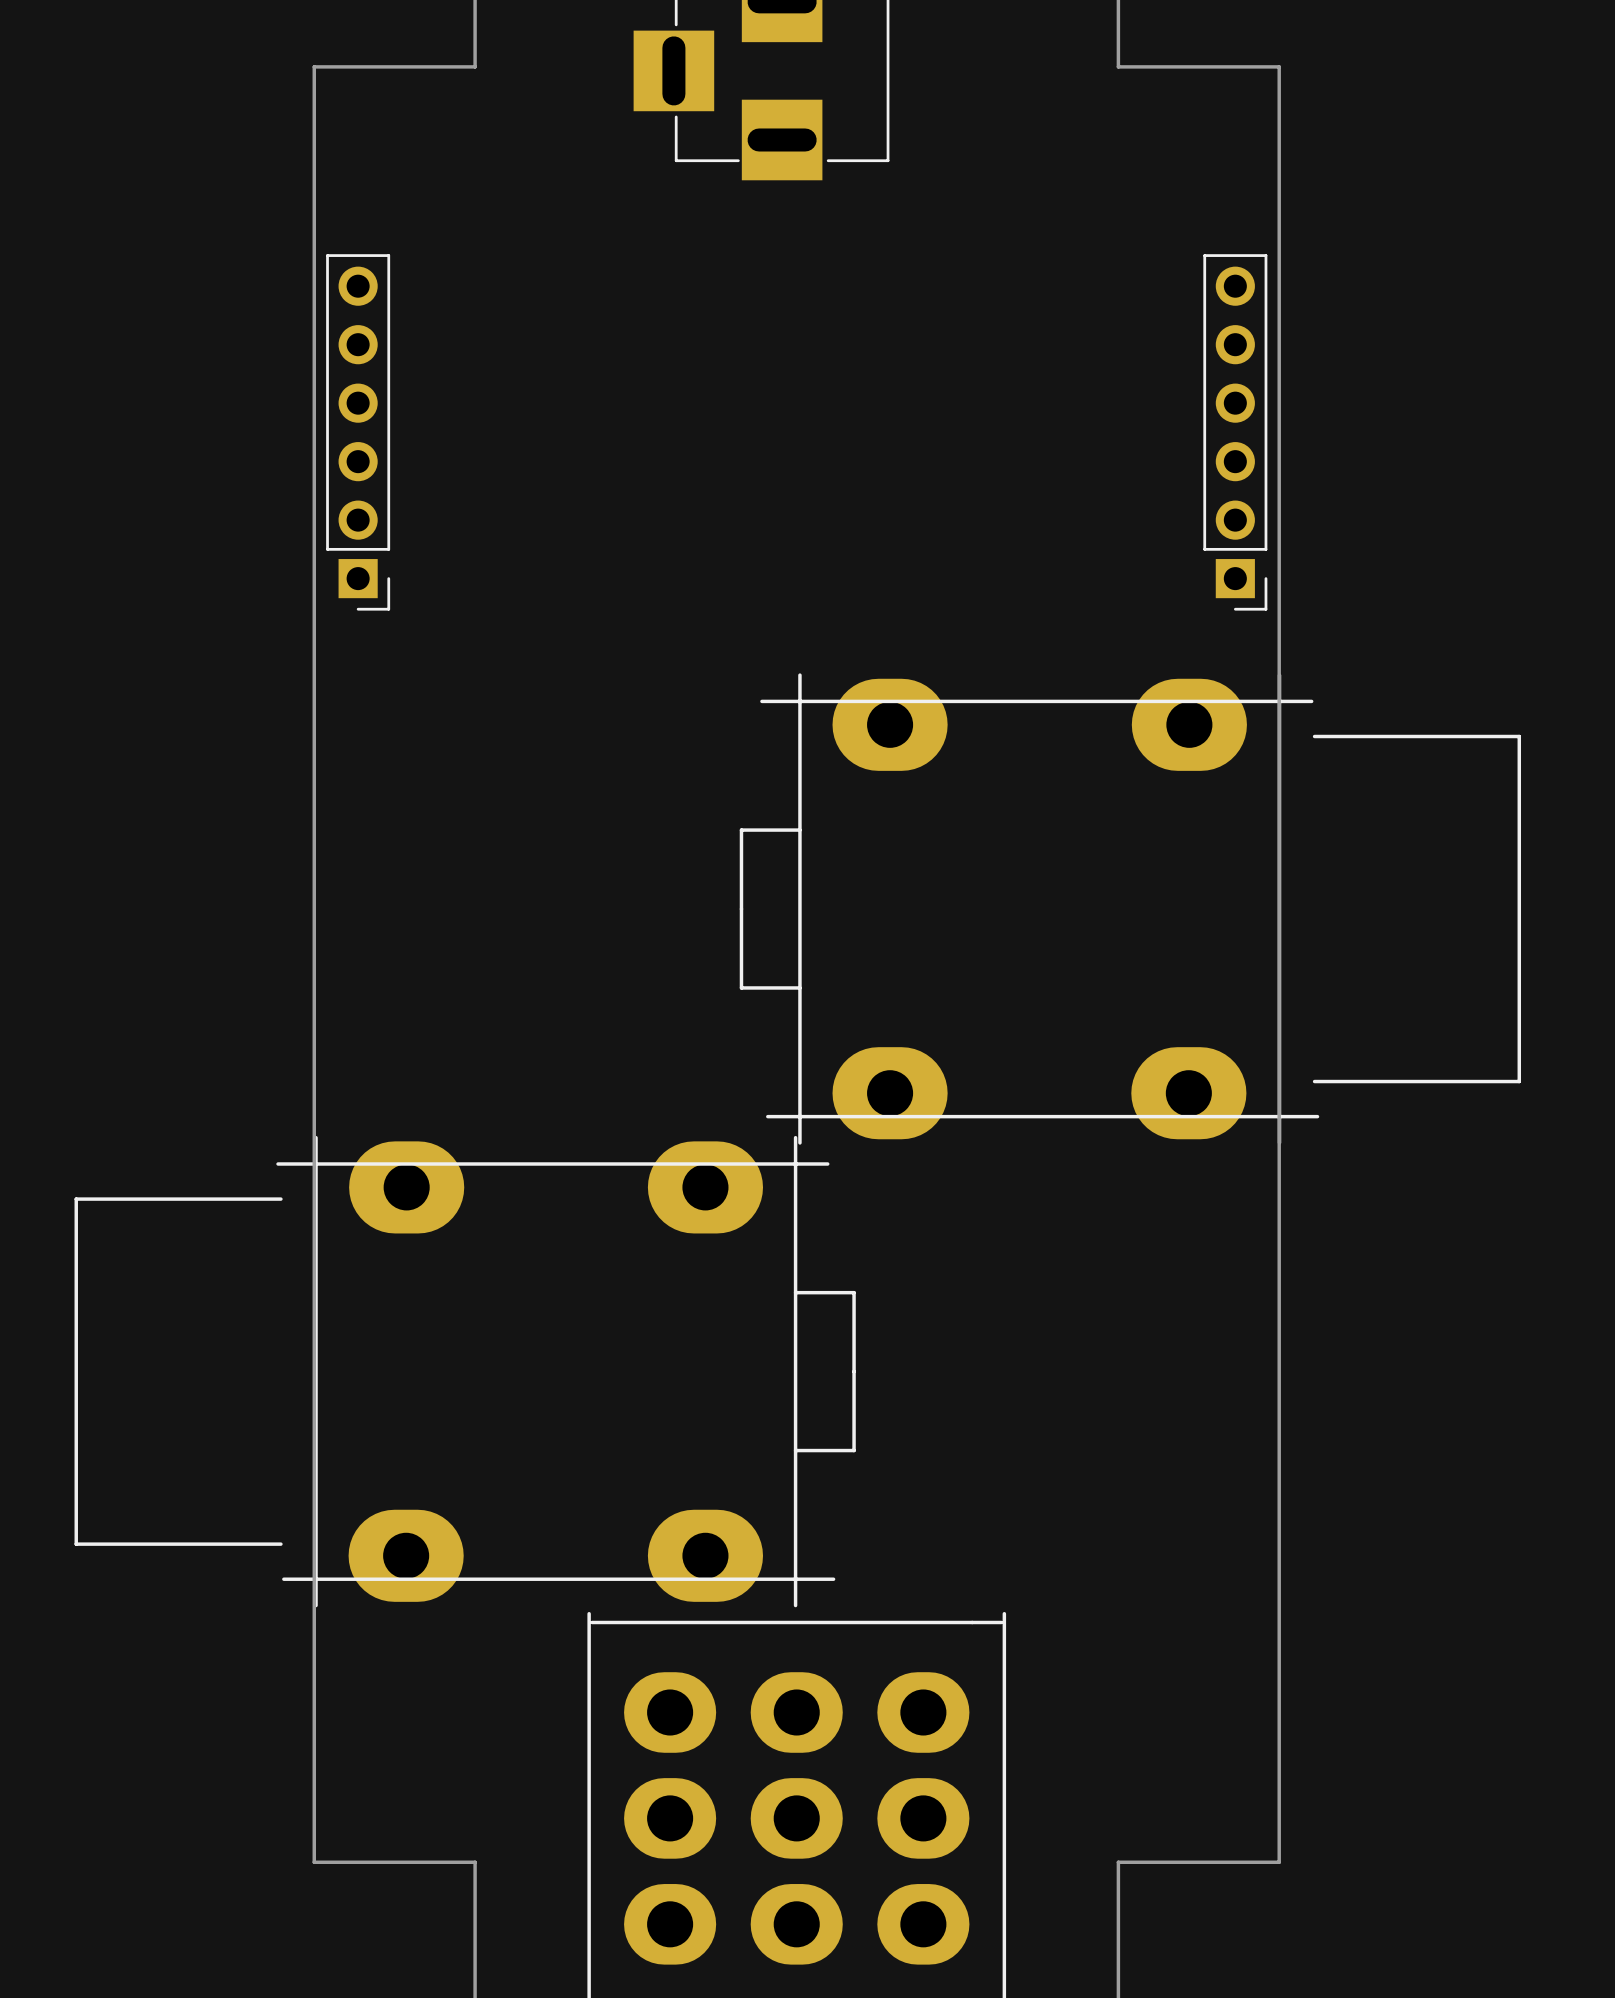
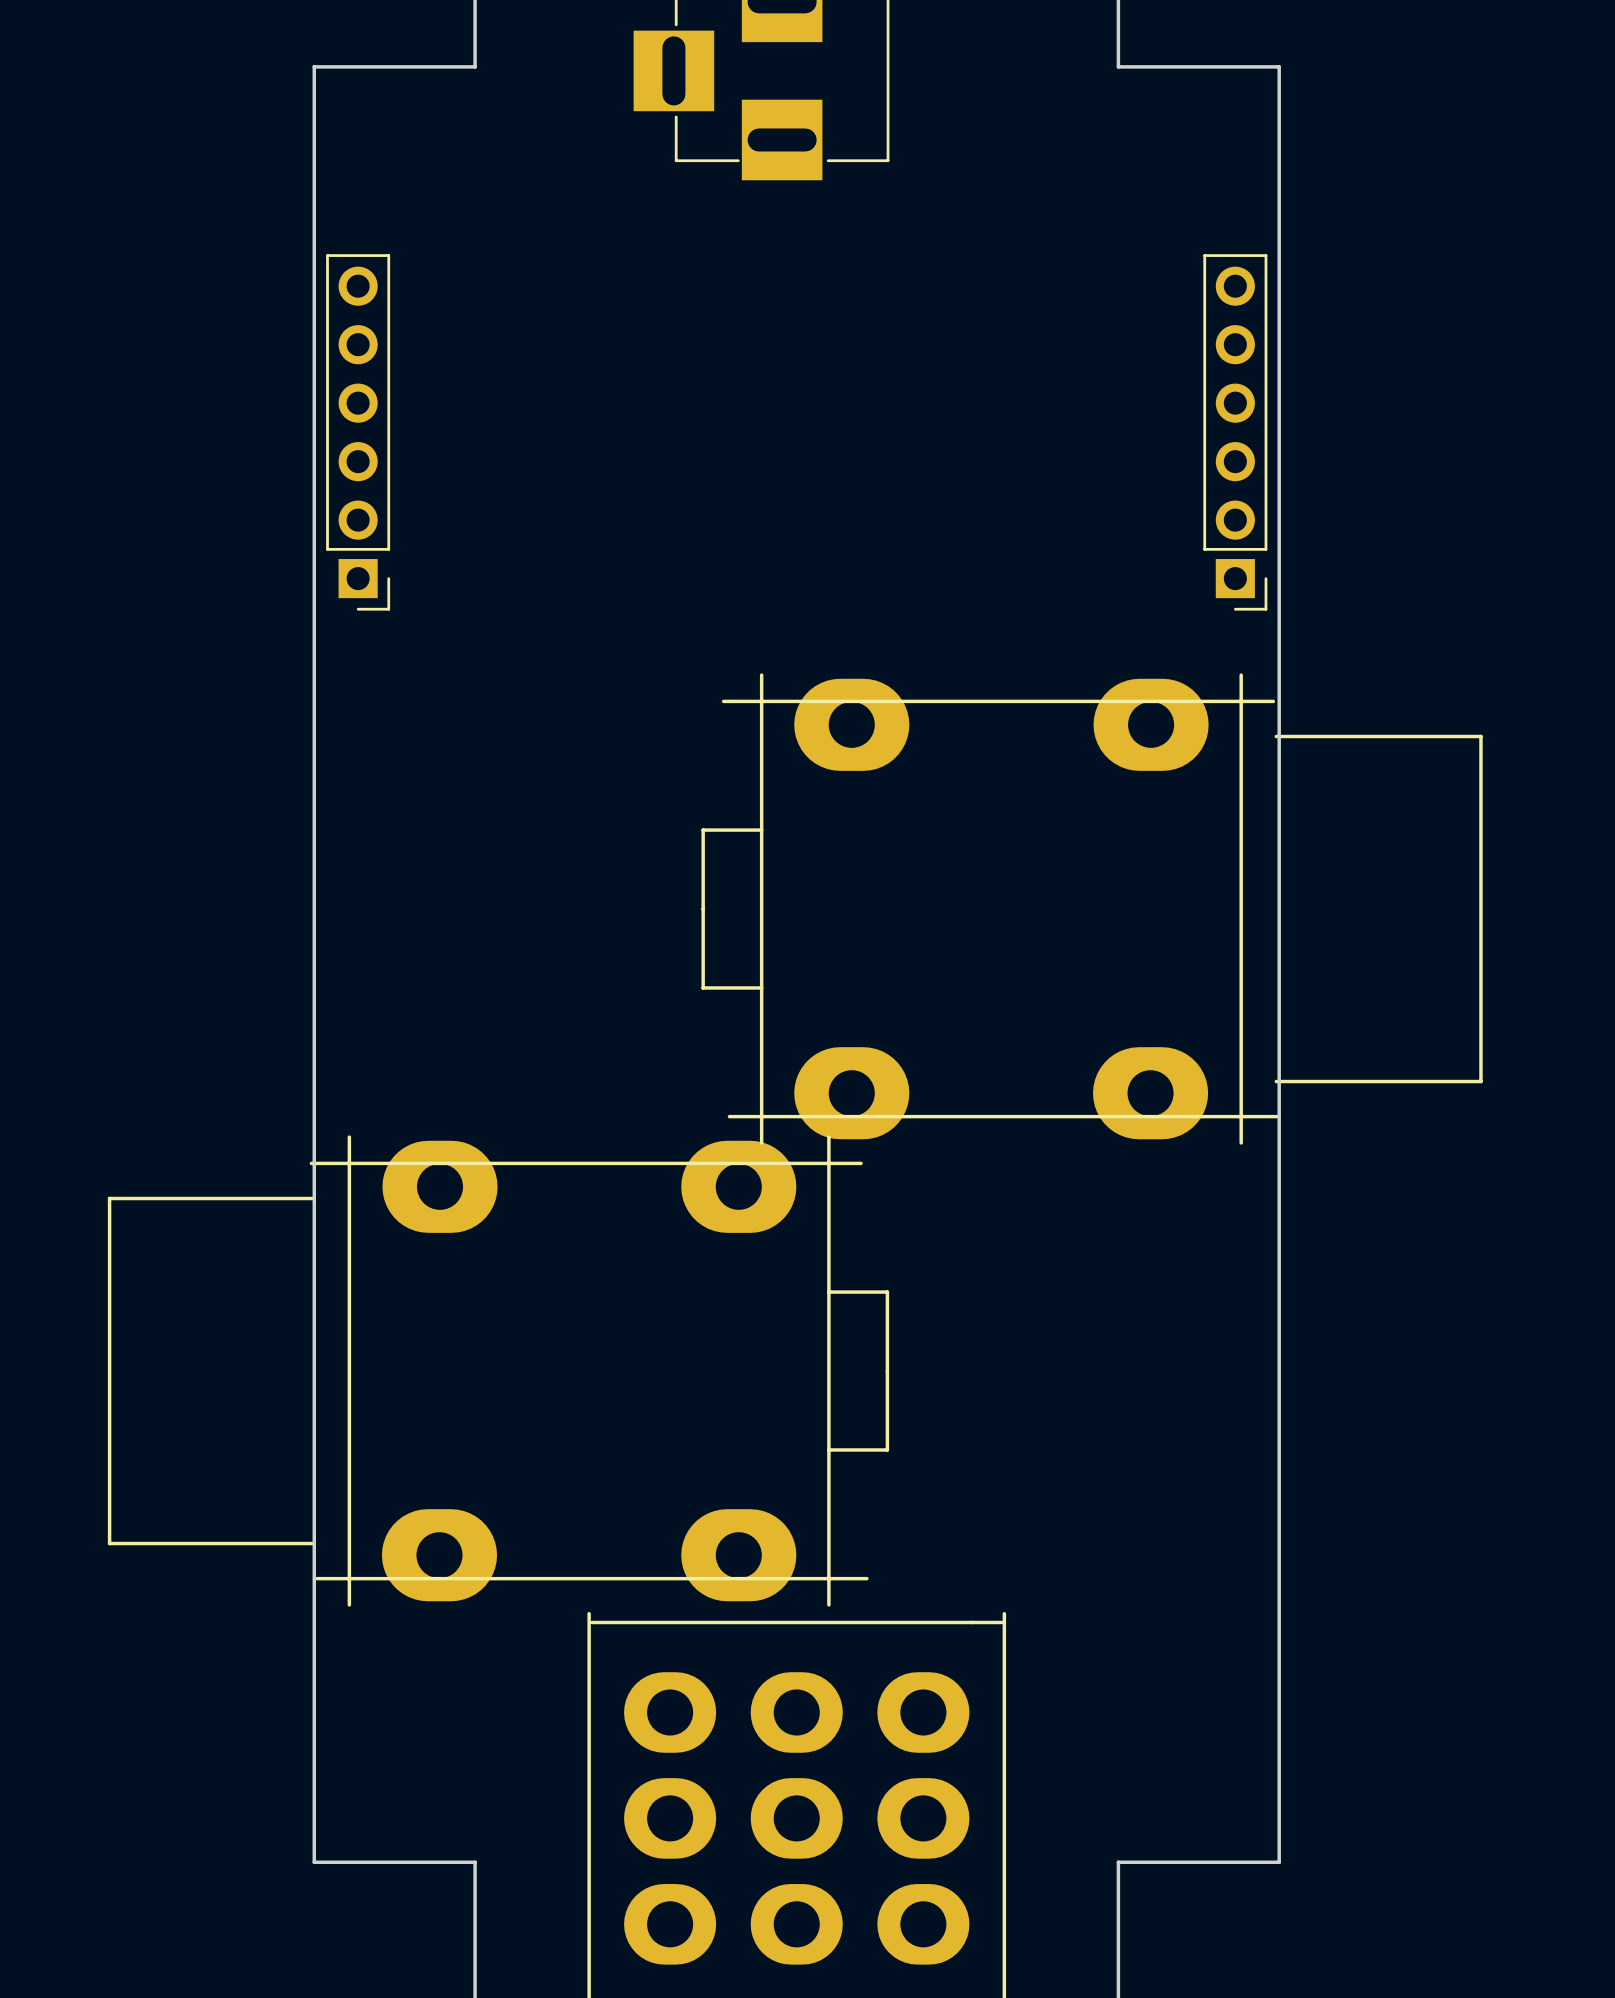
part position: (1130, 909) -> (1092, 909)
part position: (465, 1371) -> (498, 1371)

